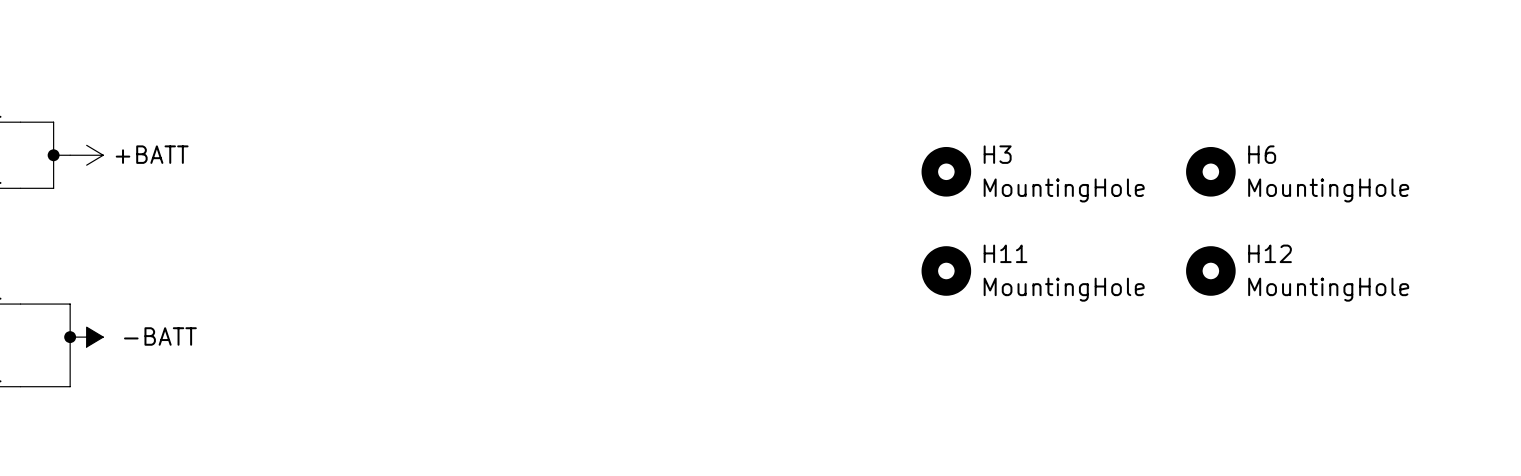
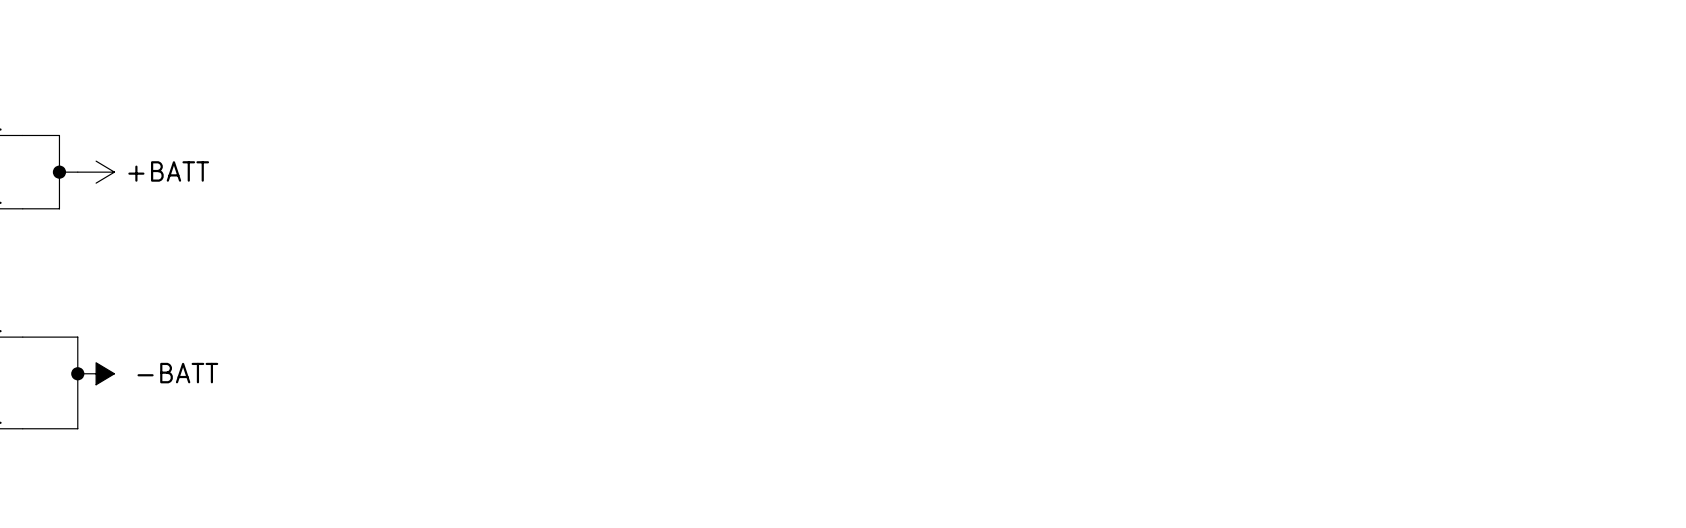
H3: MountingHole (946, 171) -> none
H6: MountingHole (1210, 171) -> none
H11: MountingHole (946, 270) -> none
H12: MountingHole (1210, 270) -> none

